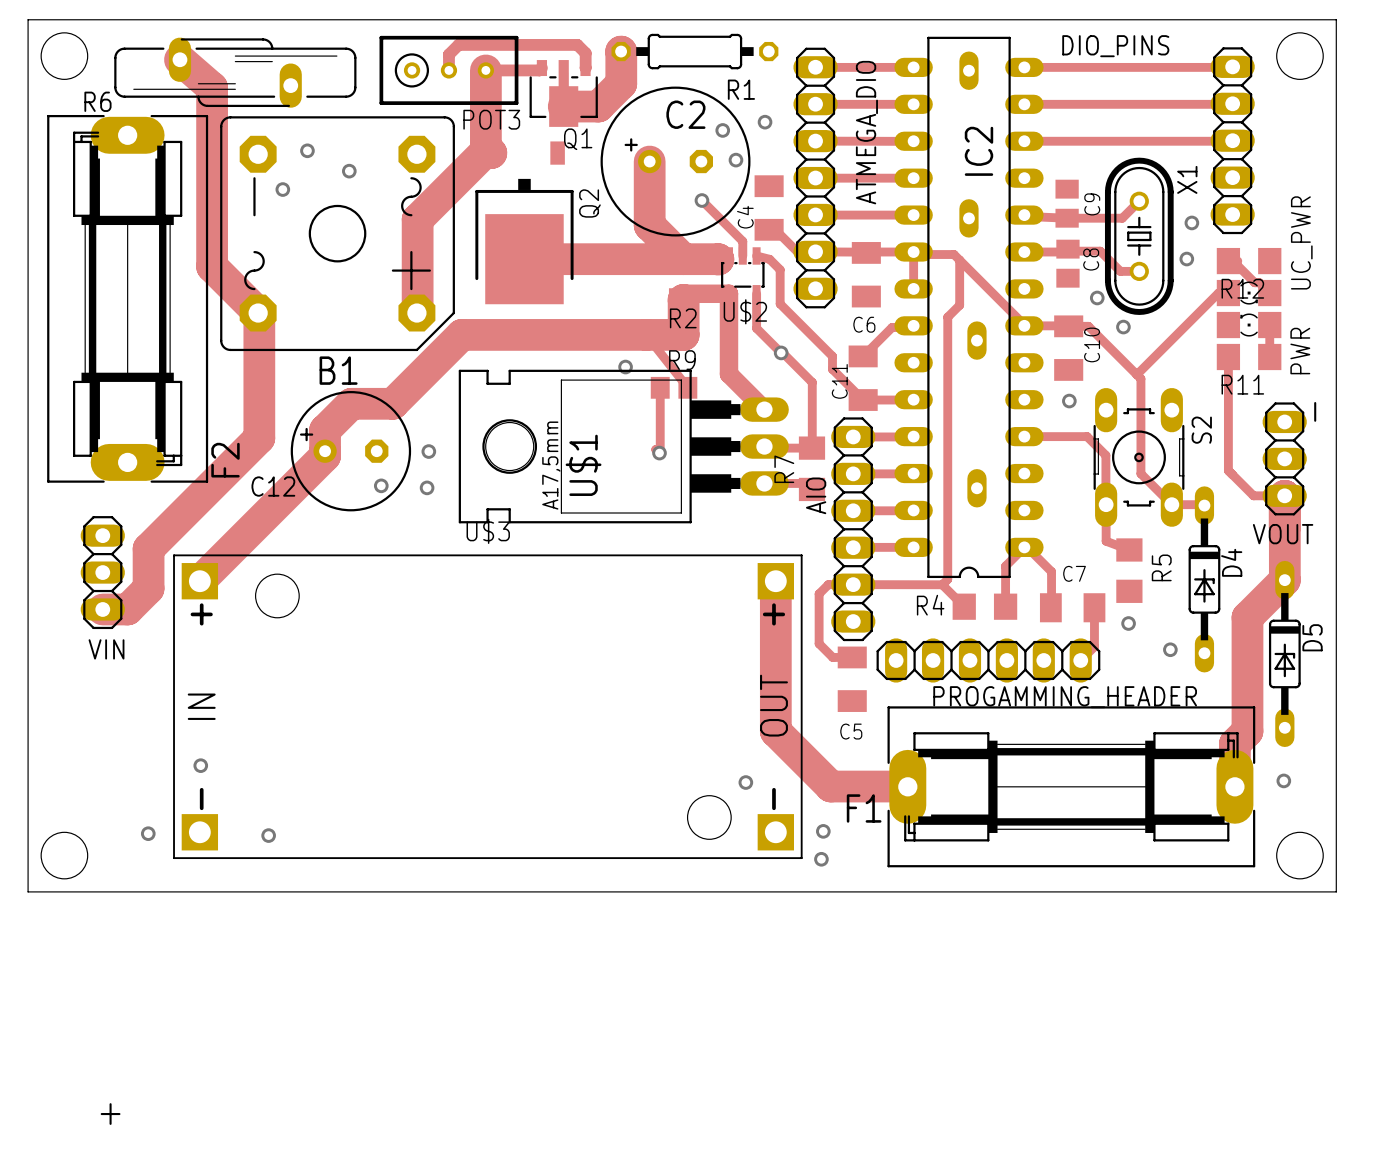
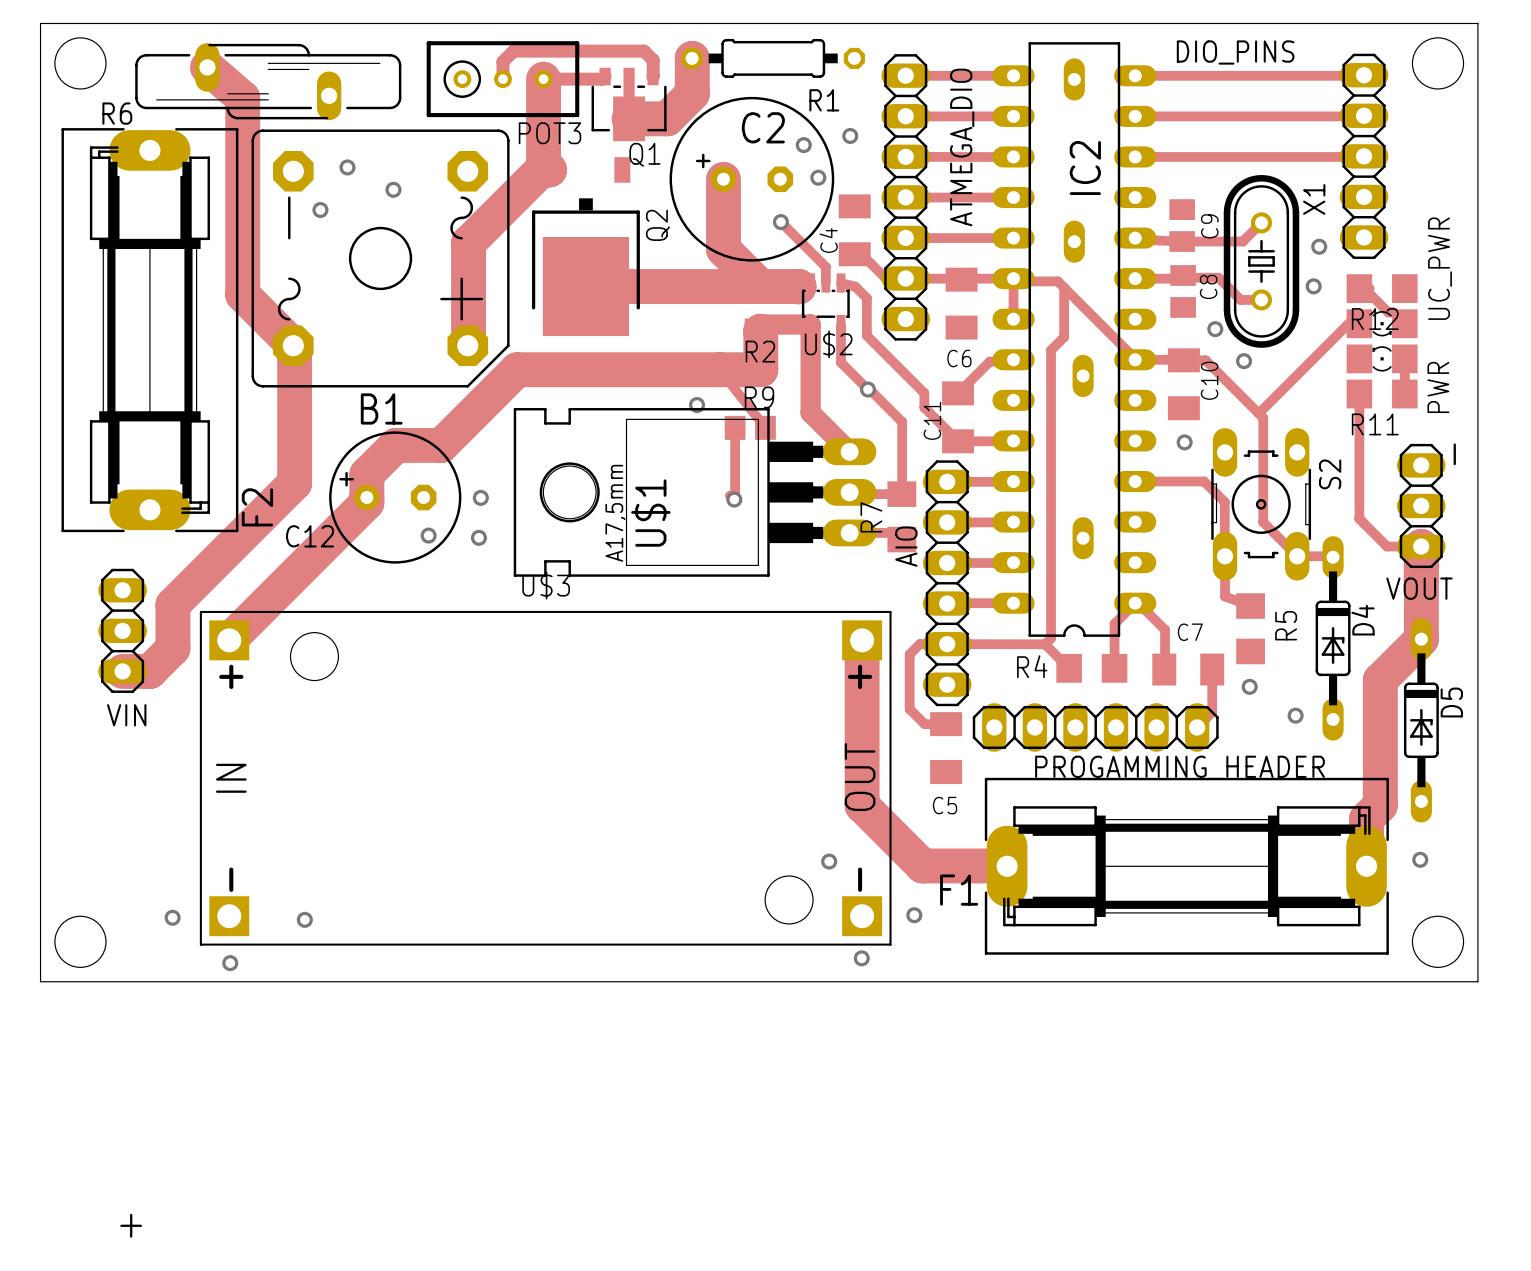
via: (200, 765) -> none
via position: (821, 859) -> (861, 958)
via: none -> (230, 963)

